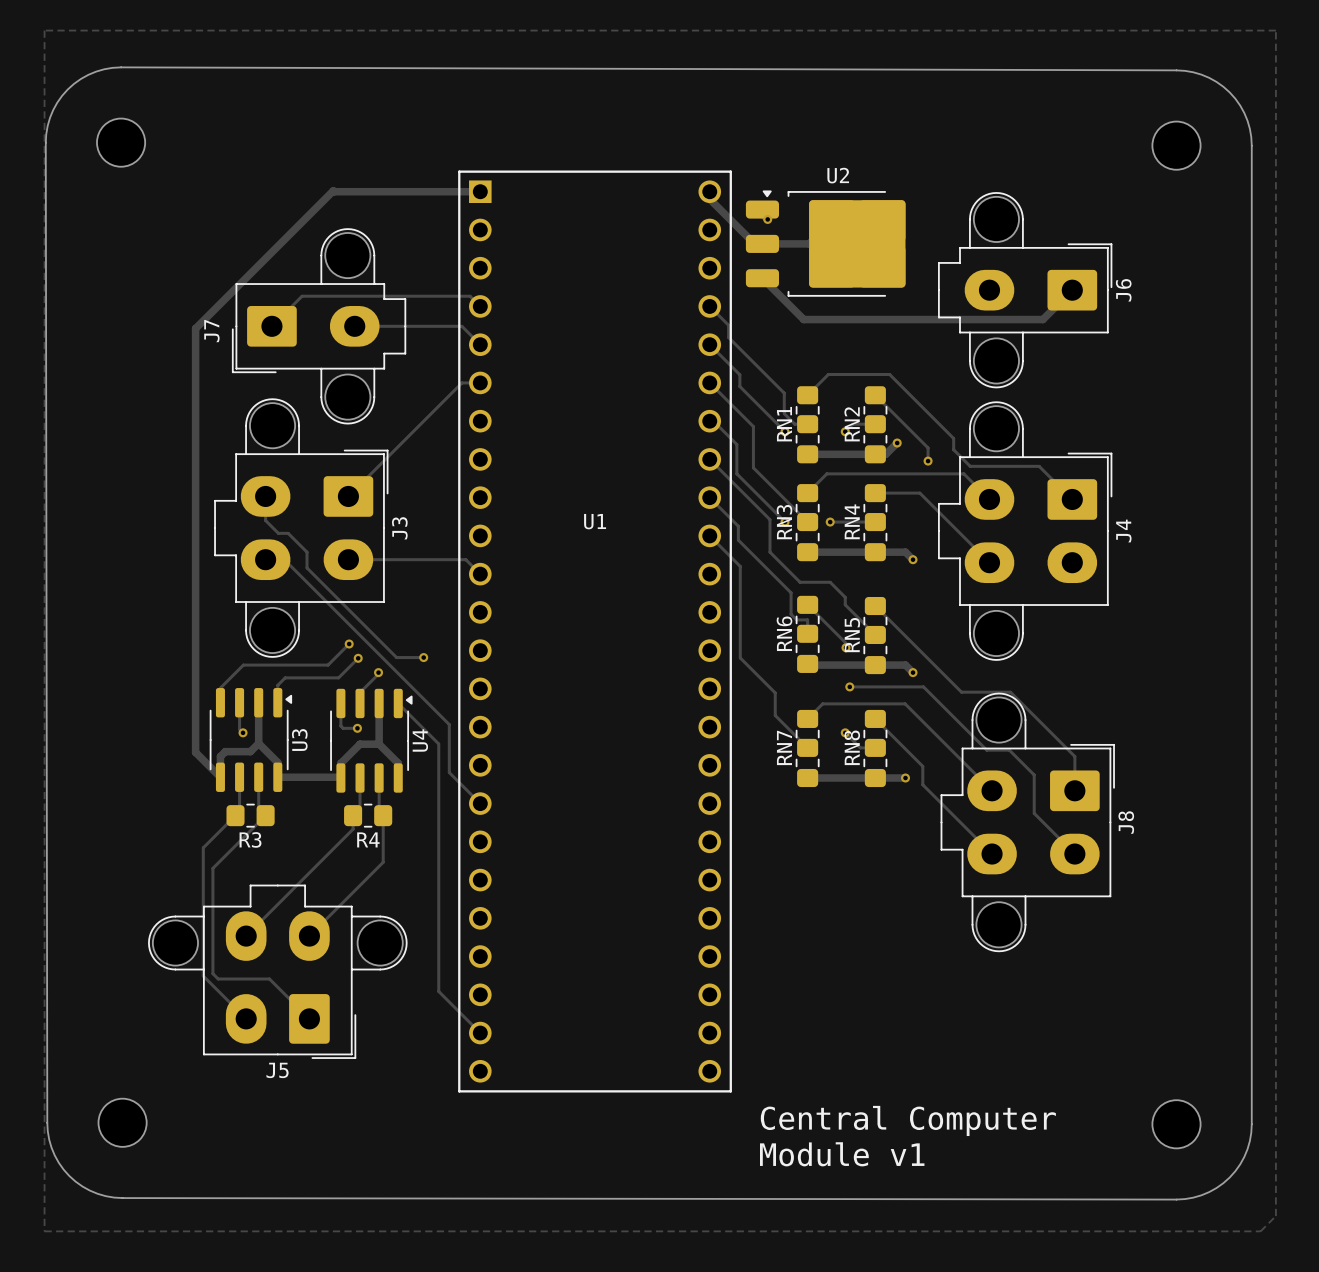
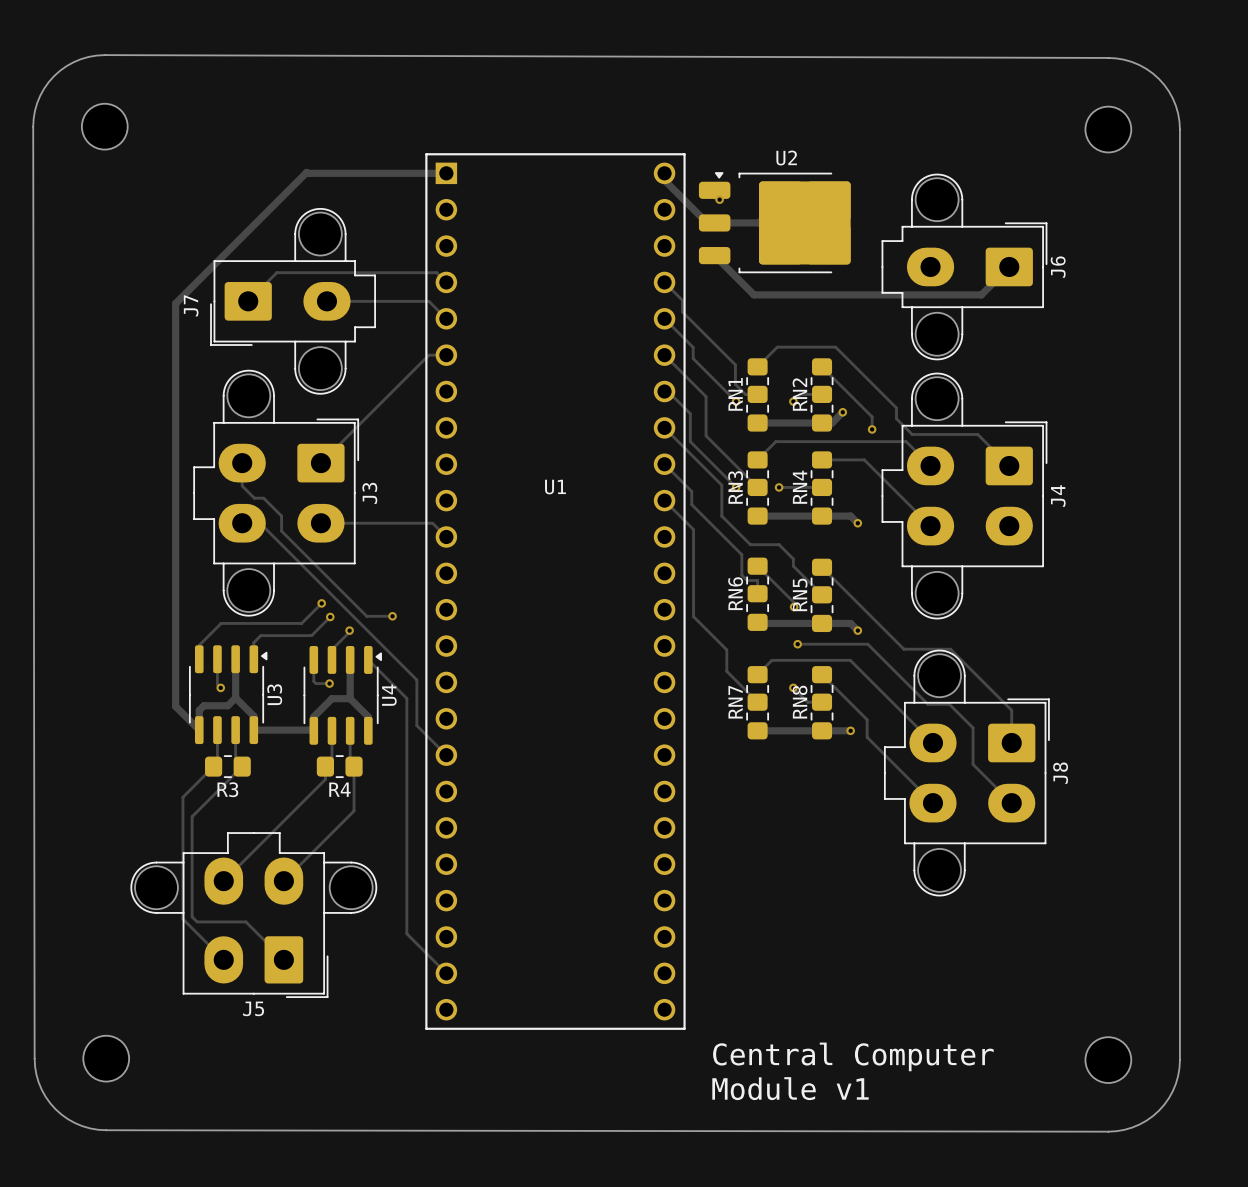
zone outline: (44, 30) (44, 1231) (1260, 1231) (1275, 1216) (1275, 30) (44, 30) -> none

